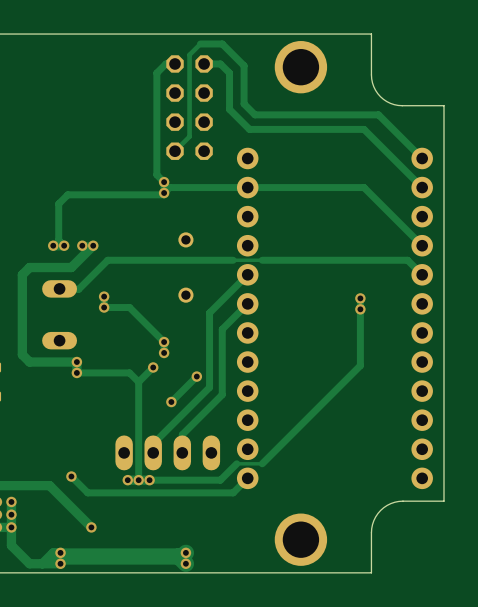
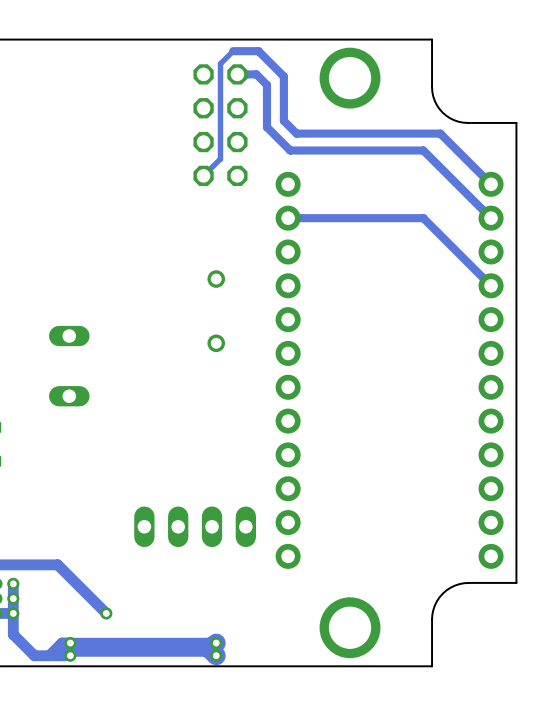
track: (175, 63) (165, 63) (156, 73) (156, 174) (164, 182) (164, 194) (67, 194) (58, 203) (58, 240) (64, 245) (53, 245) -> none
via: (164, 182) -> none
track: (247, 187) (169, 187) (164, 193) -> none
via: (164, 193) -> none
via: (53, 245) -> none
via: (64, 245) -> none
via: (82, 245) -> none
track: (93, 245) (71, 267) (29, 267) (22, 274) (22, 354) (29, 362) (76, 362) (76, 372) (129, 372) (138, 382) -> none
via: (93, 245) -> none
track: (247, 274) (209, 312) (209, 387) (153, 443) (153, 452) -> none
track: (422, 274) (407, 260) (107, 260) (78, 289) (59, 288) -> none
track: (104, 296) (104, 307) (129, 307) (164, 342) (164, 352) -> none
via: (104, 296) -> none
track: (360, 298) (360, 365) (262, 463) (236, 463) (220, 480) (127, 480) -> none
via: (360, 298) -> none
track: (247, 303) (222, 329) (222, 394) (182, 434) (182, 452) -> none
via: (104, 307) -> none
via: (360, 309) -> none
via: (164, 342) -> none
via: (164, 352) -> none
via: (76, 362) -> none
track: (153, 367) (138, 382) -> none
via: (153, 367) -> none
via: (76, 372) -> none
track: (196, 376) (171, 402) -> none
via: (196, 376) -> none
track: (138, 382) (138, 480) -> none
via: (171, 402) -> none
track: (71, 476) (87, 492) (233, 492) (247, 478) -> none
via: (71, 476) -> none
via: (127, 480) -> none
via: (138, 480) -> none
via: (149, 480) -> none

